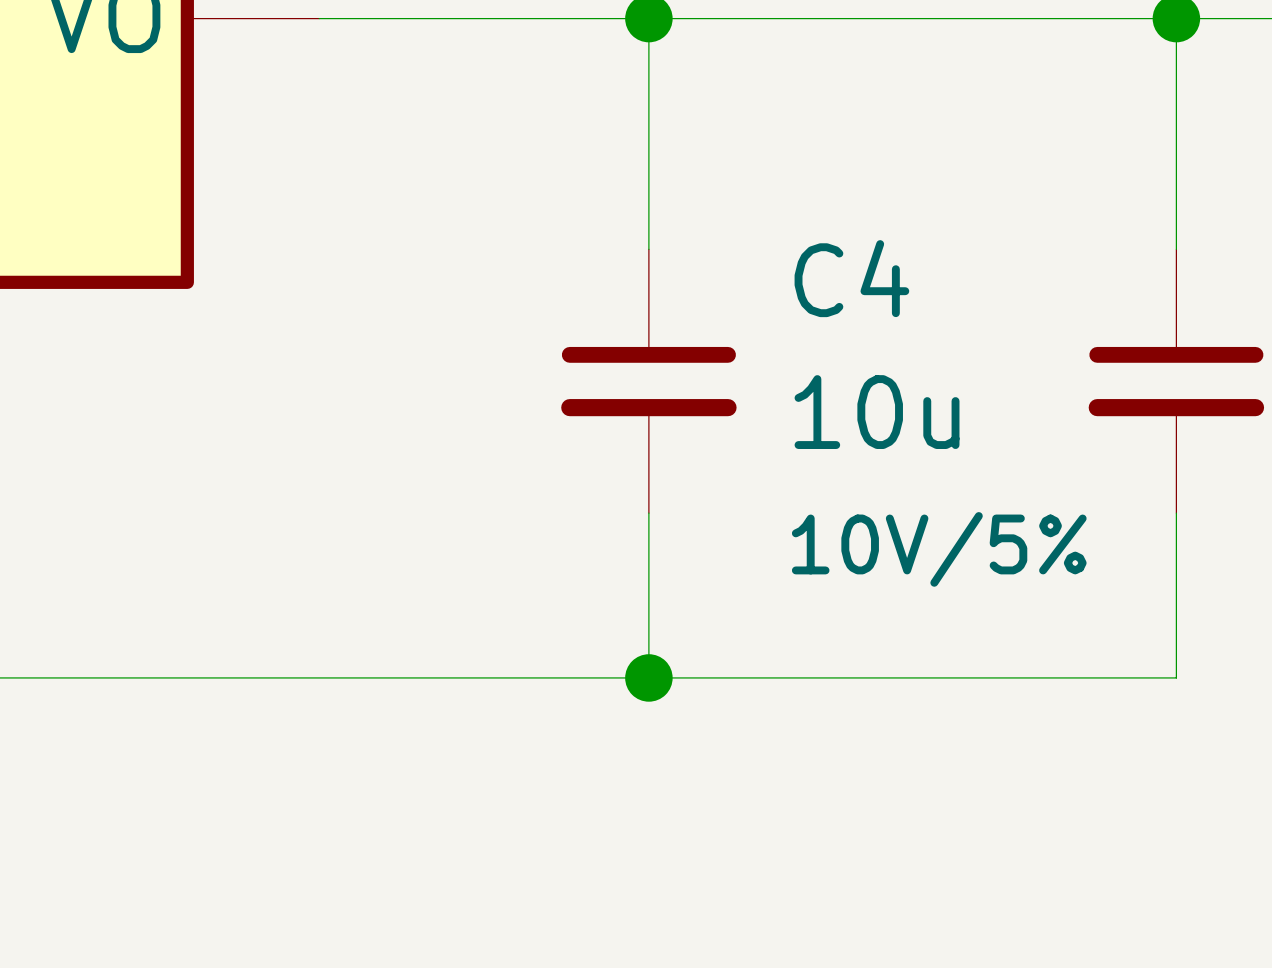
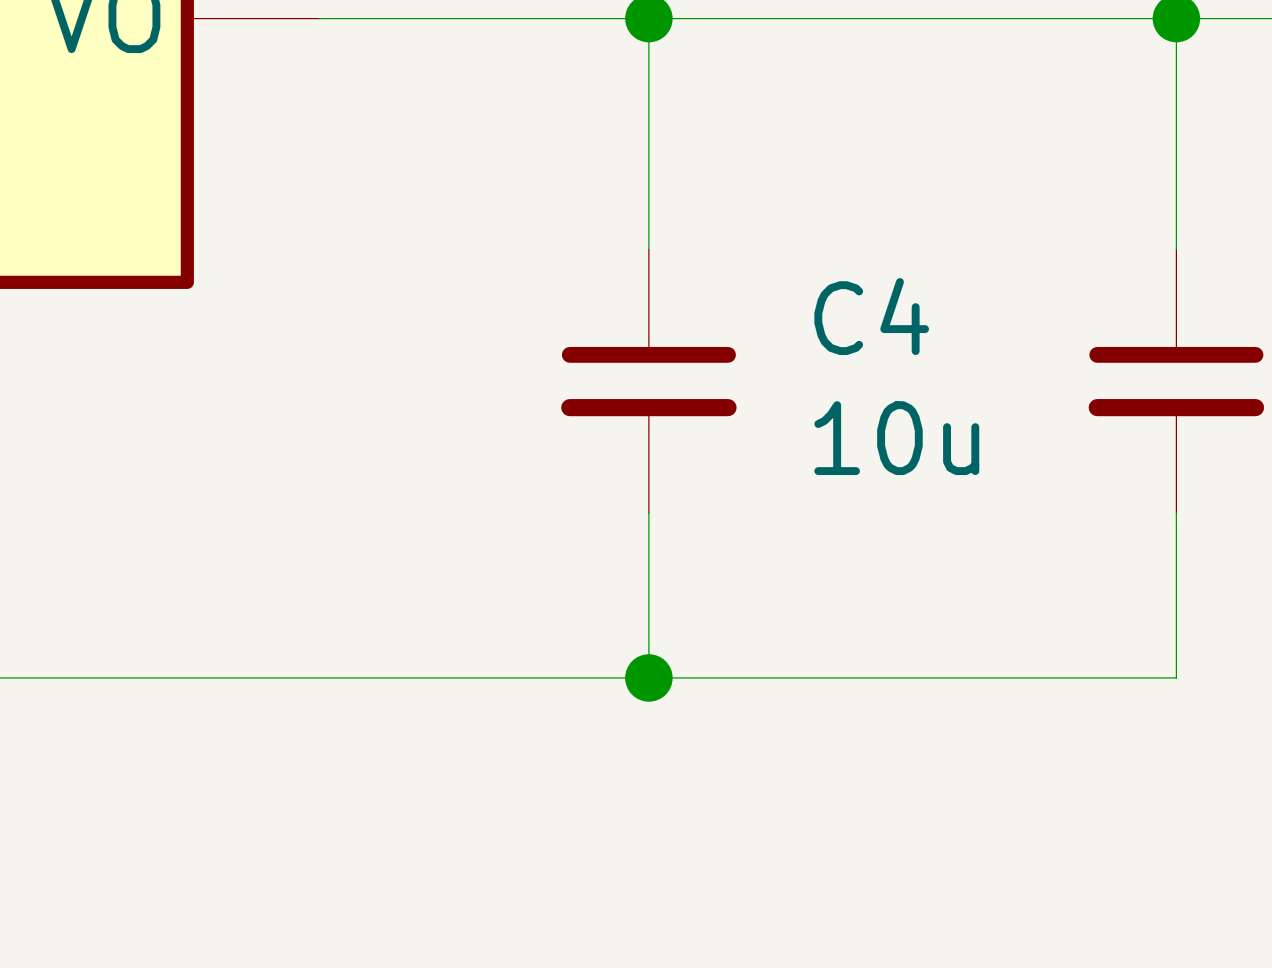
C4 name position: C4 (851, 278) -> C4 (871, 316)
C4 value position: 10u (877, 412) -> 10u (896, 438)
C4 text: 10V/5% (939, 549) -> none

